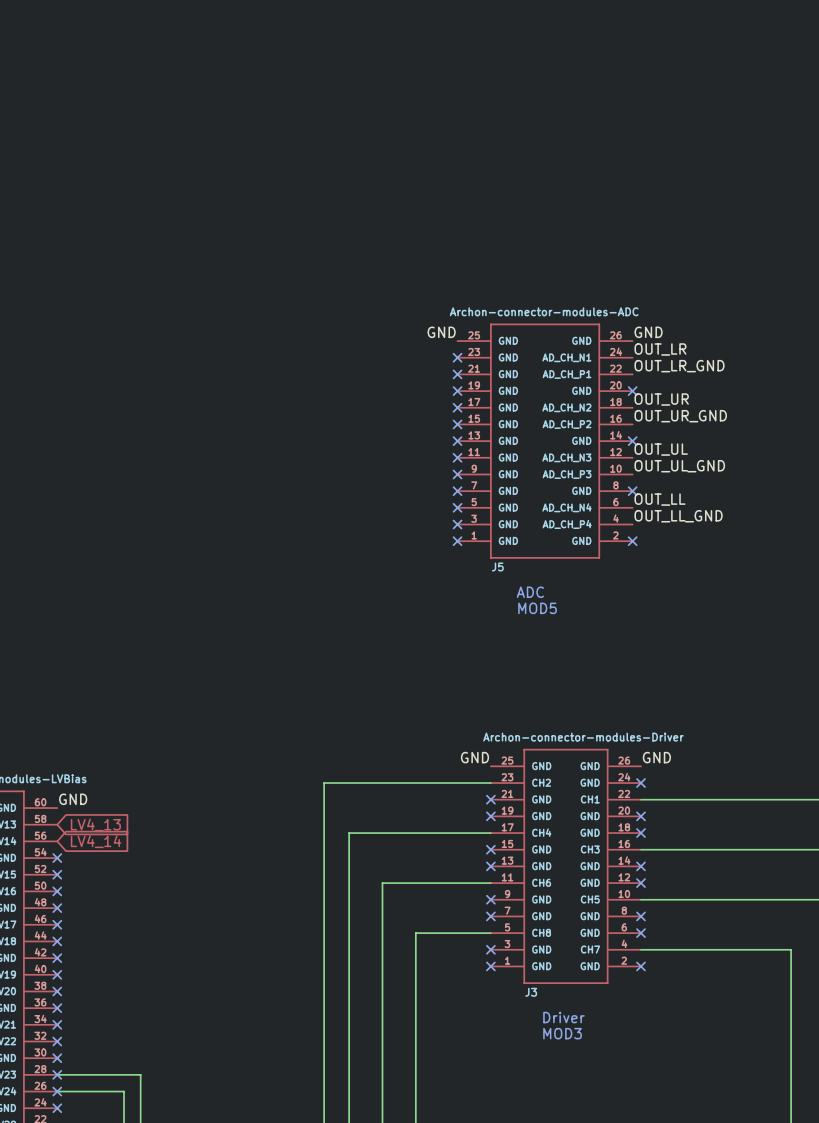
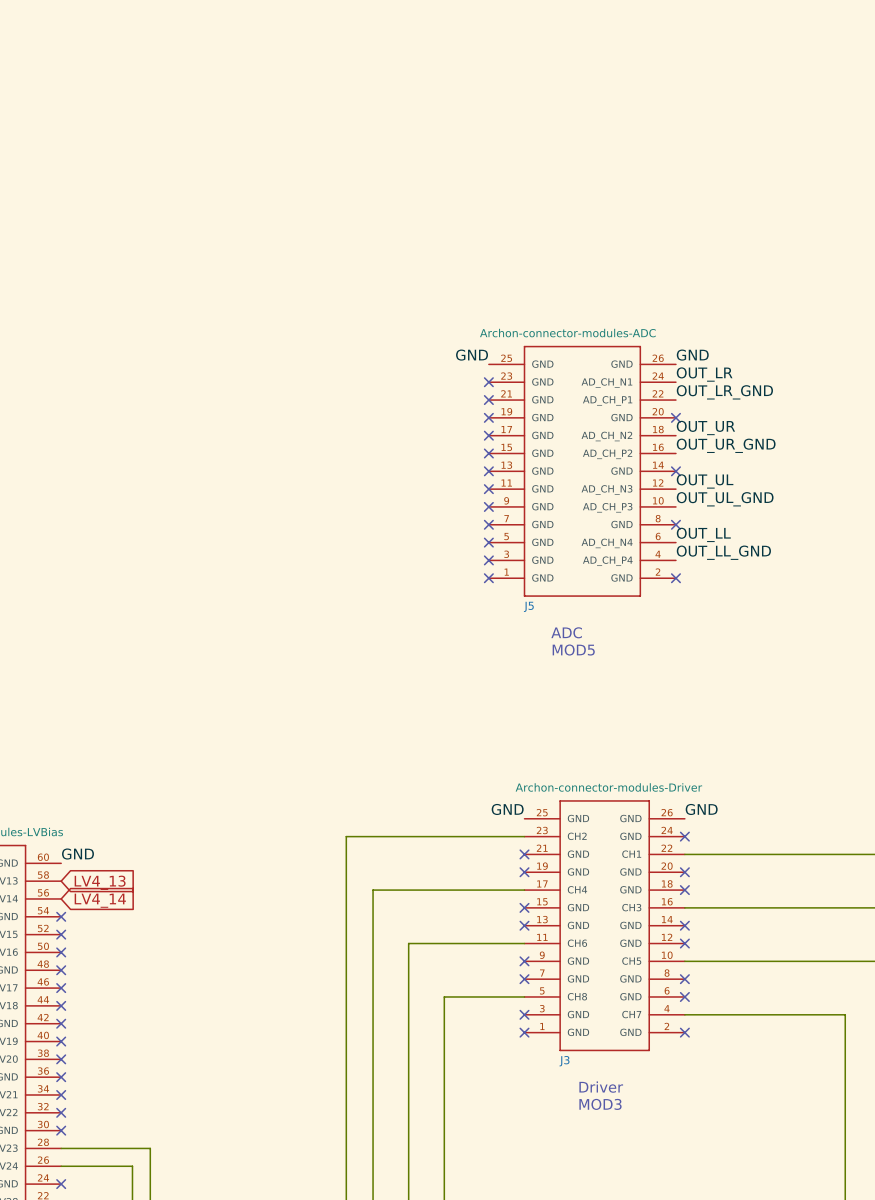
no-connect mark: (57, 1074) -> none
no-connect mark: (57, 1091) -> none

